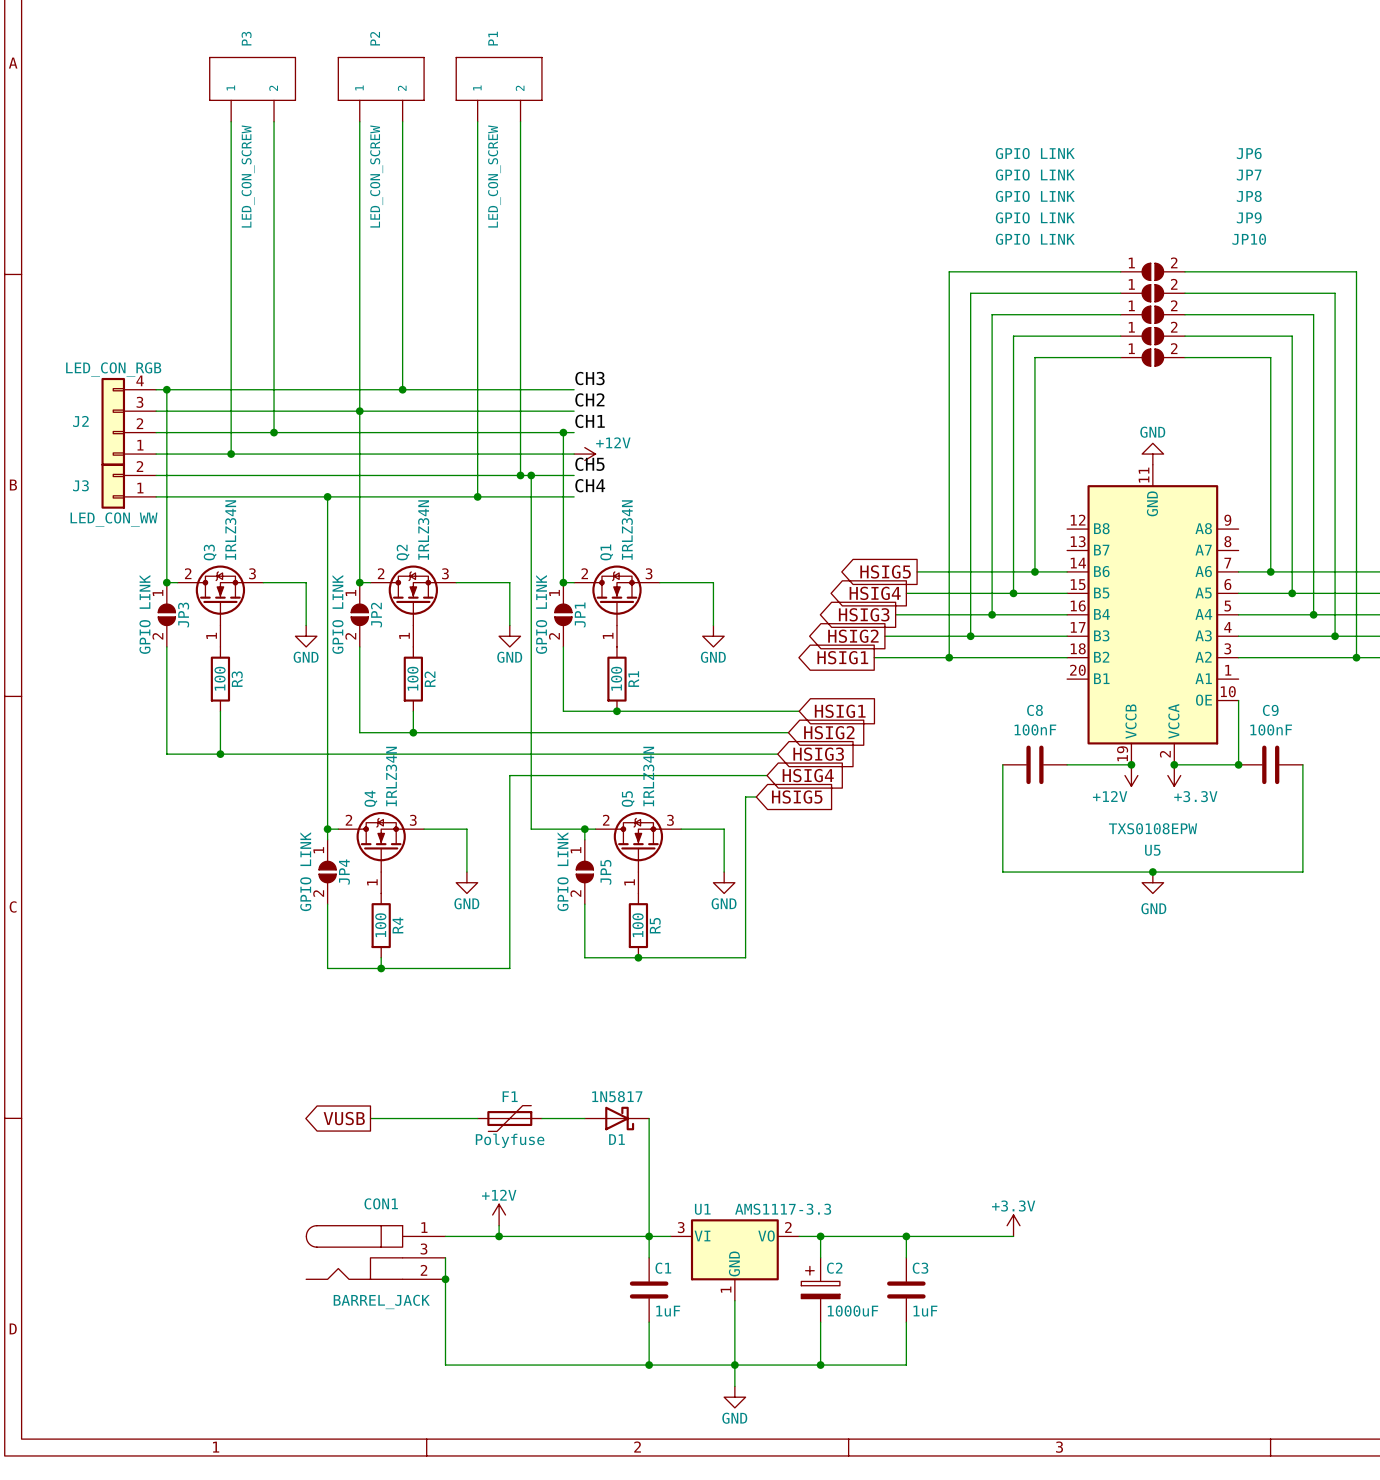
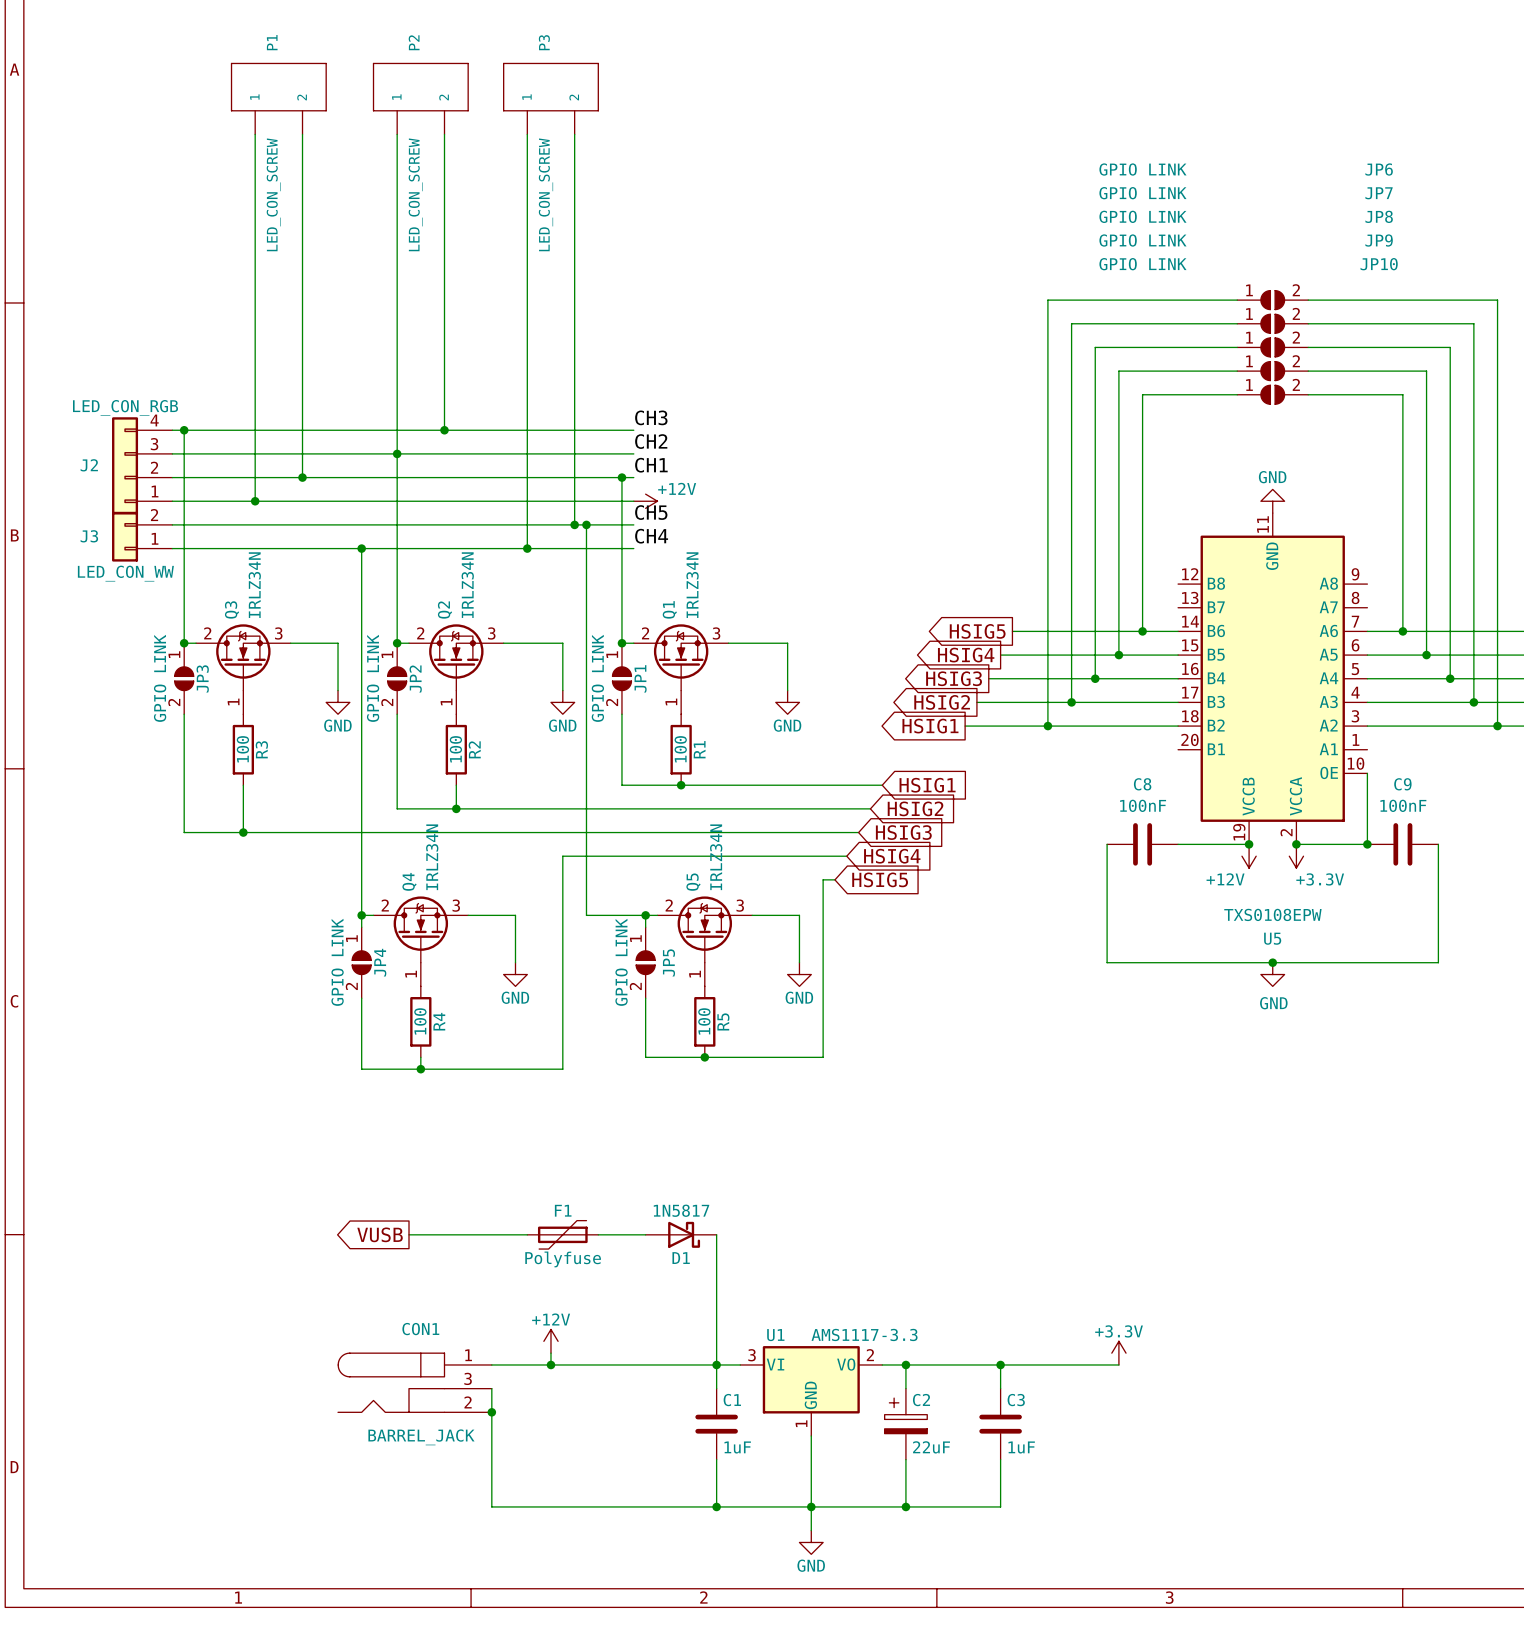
P3 name: P3 (246, 38) -> P1 (272, 42)
P1 name: P1 (493, 38) -> P3 (544, 42)
C2 value: 1000uF (852, 1311) -> 22uF (931, 1447)

